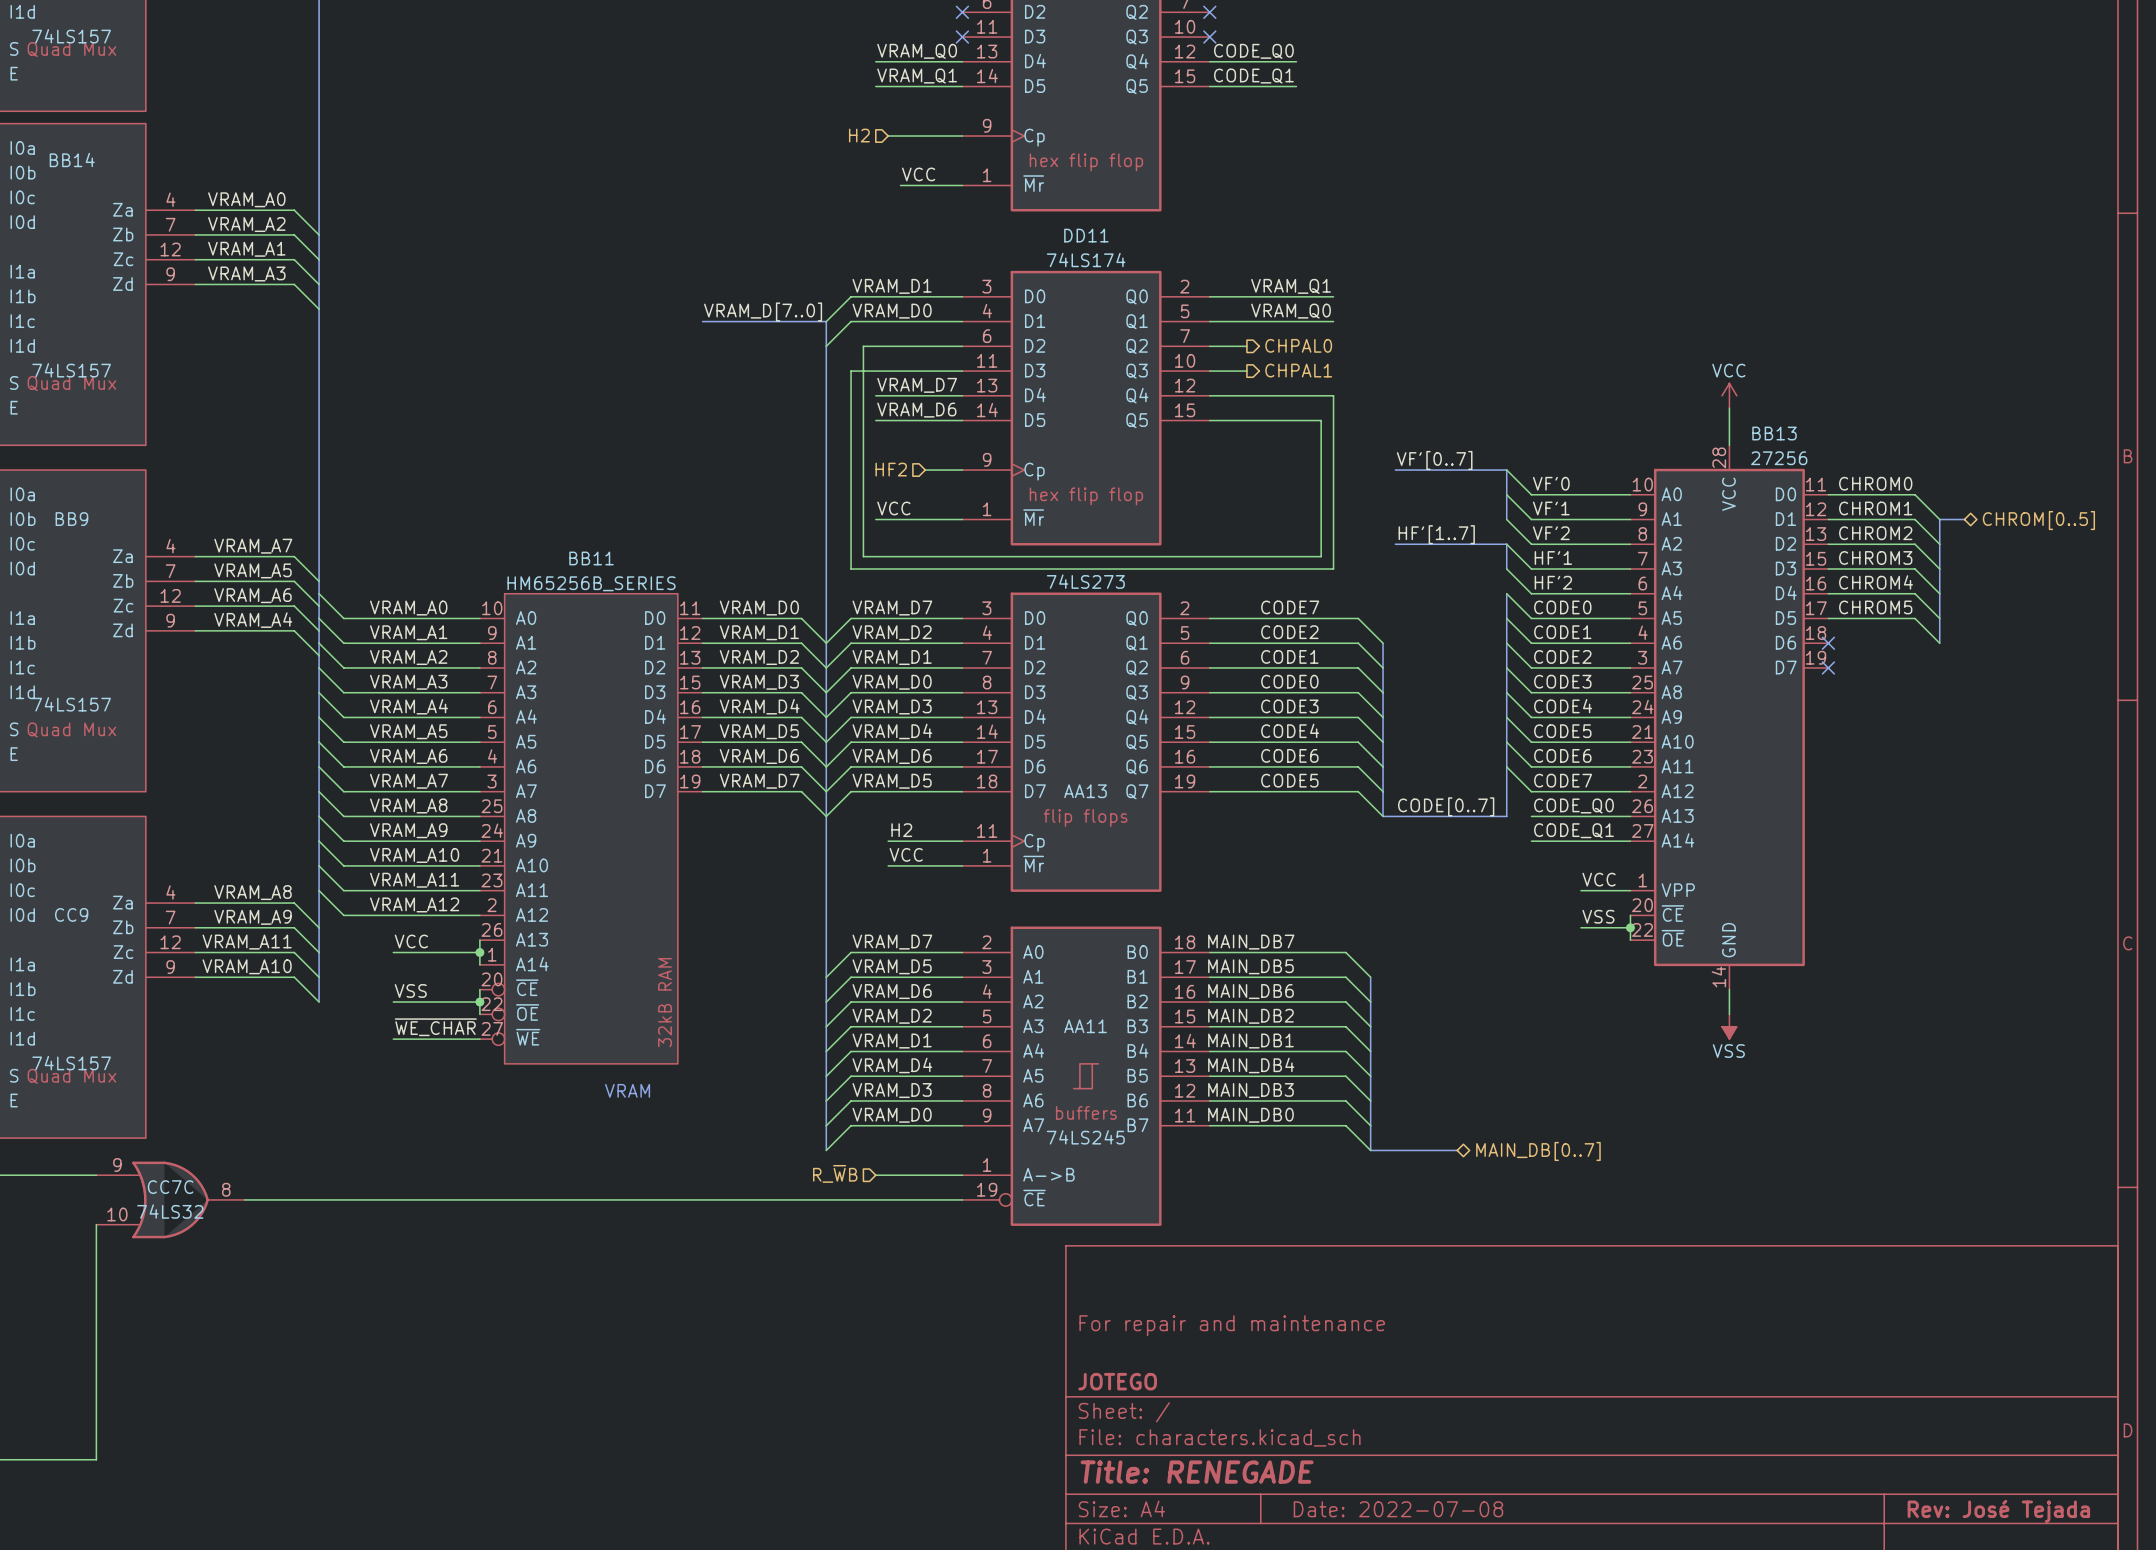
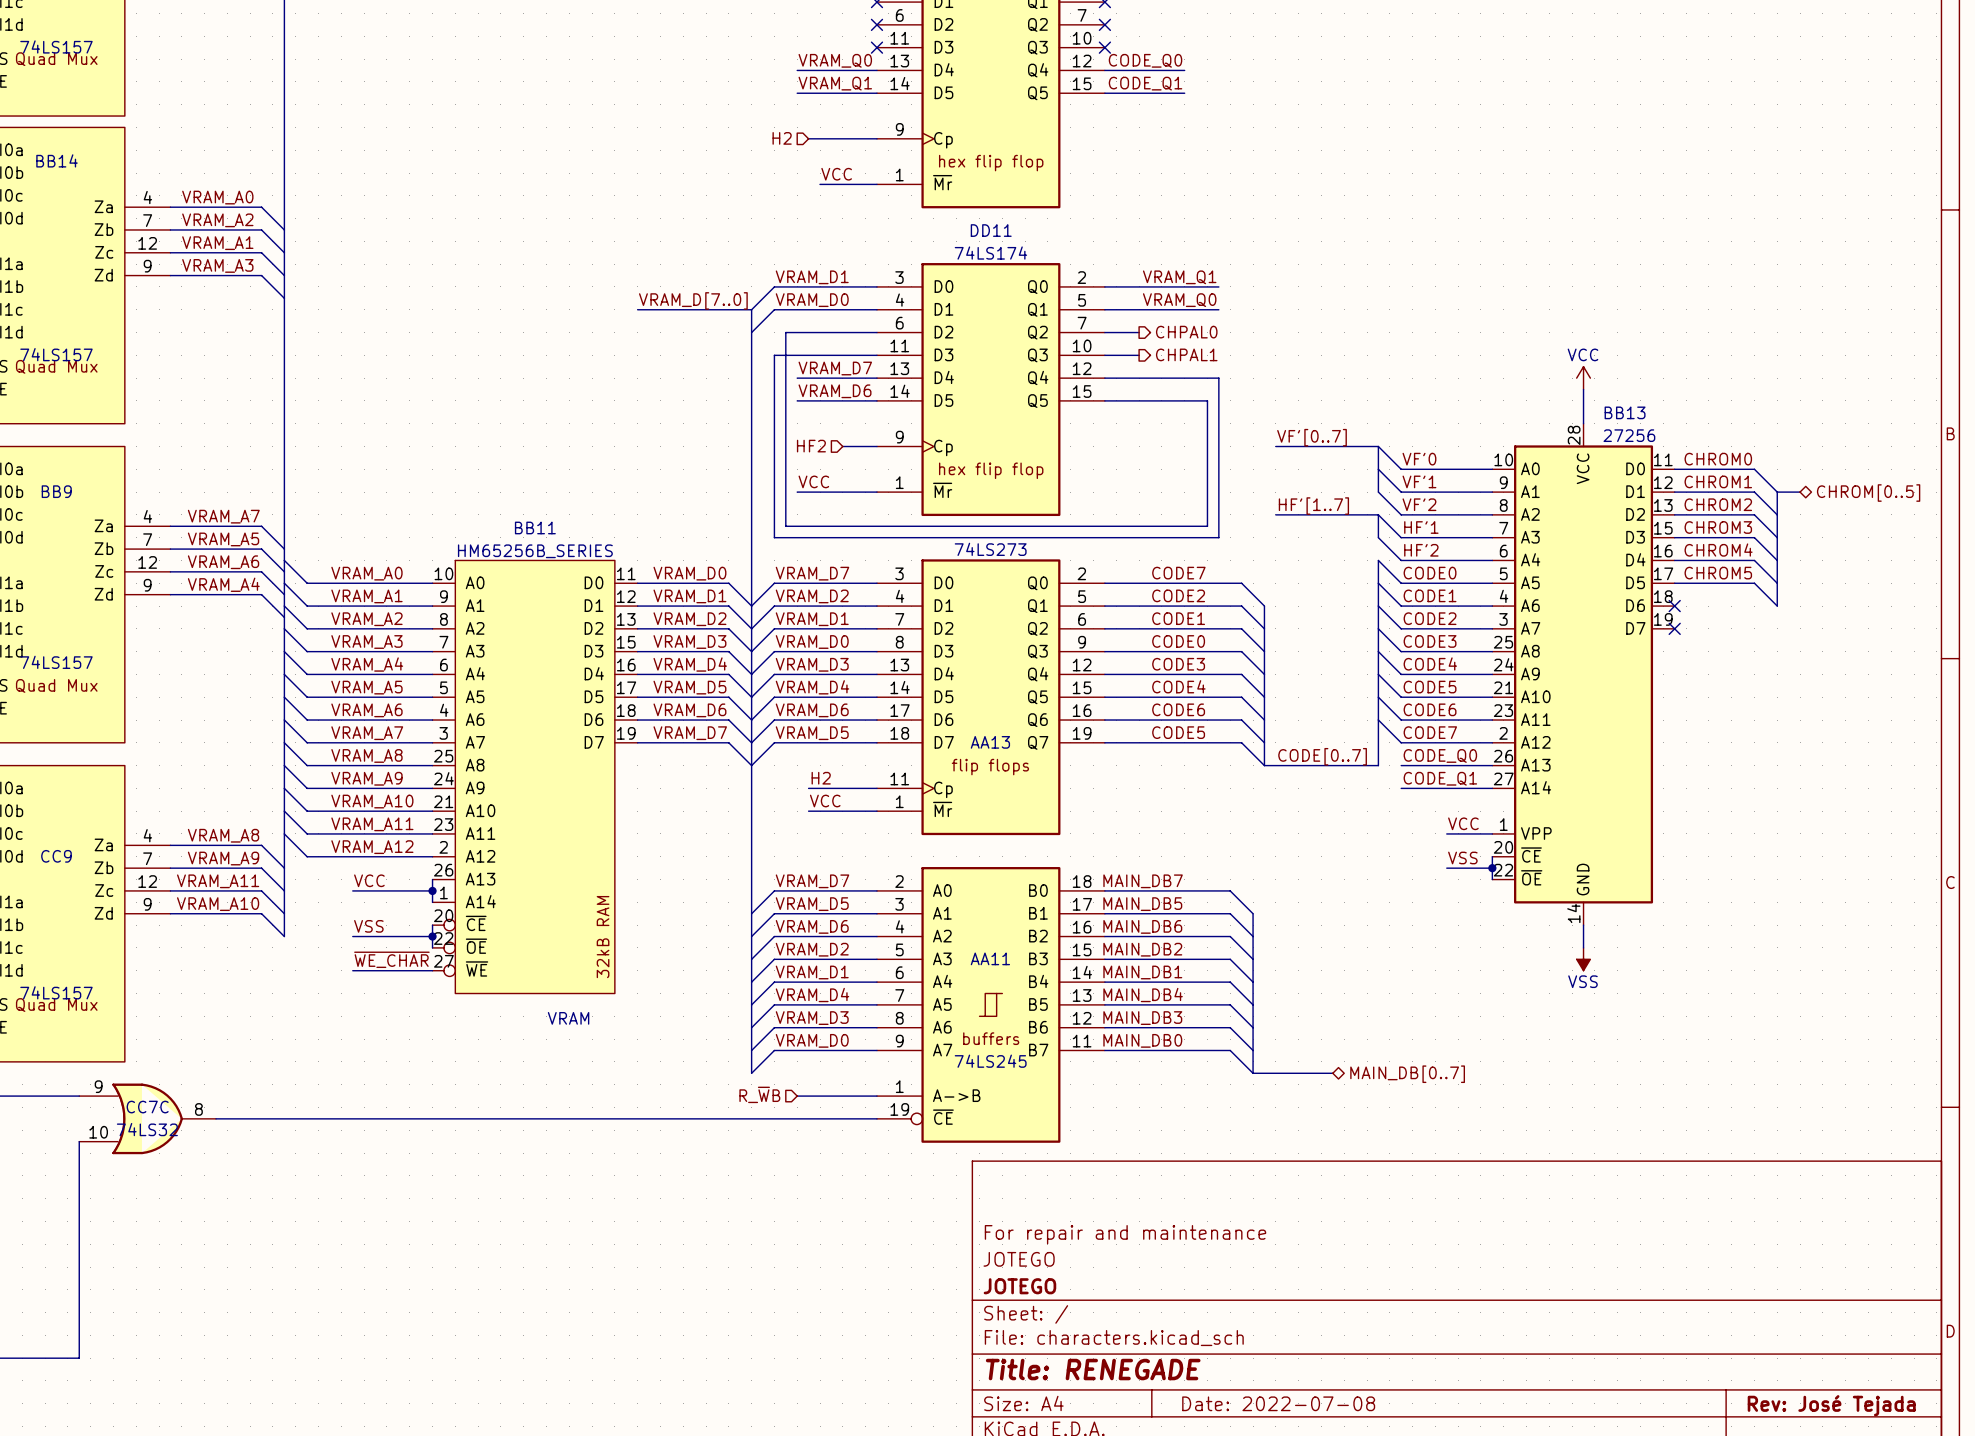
title block: none -> JOTEGO (1019, 1259)

